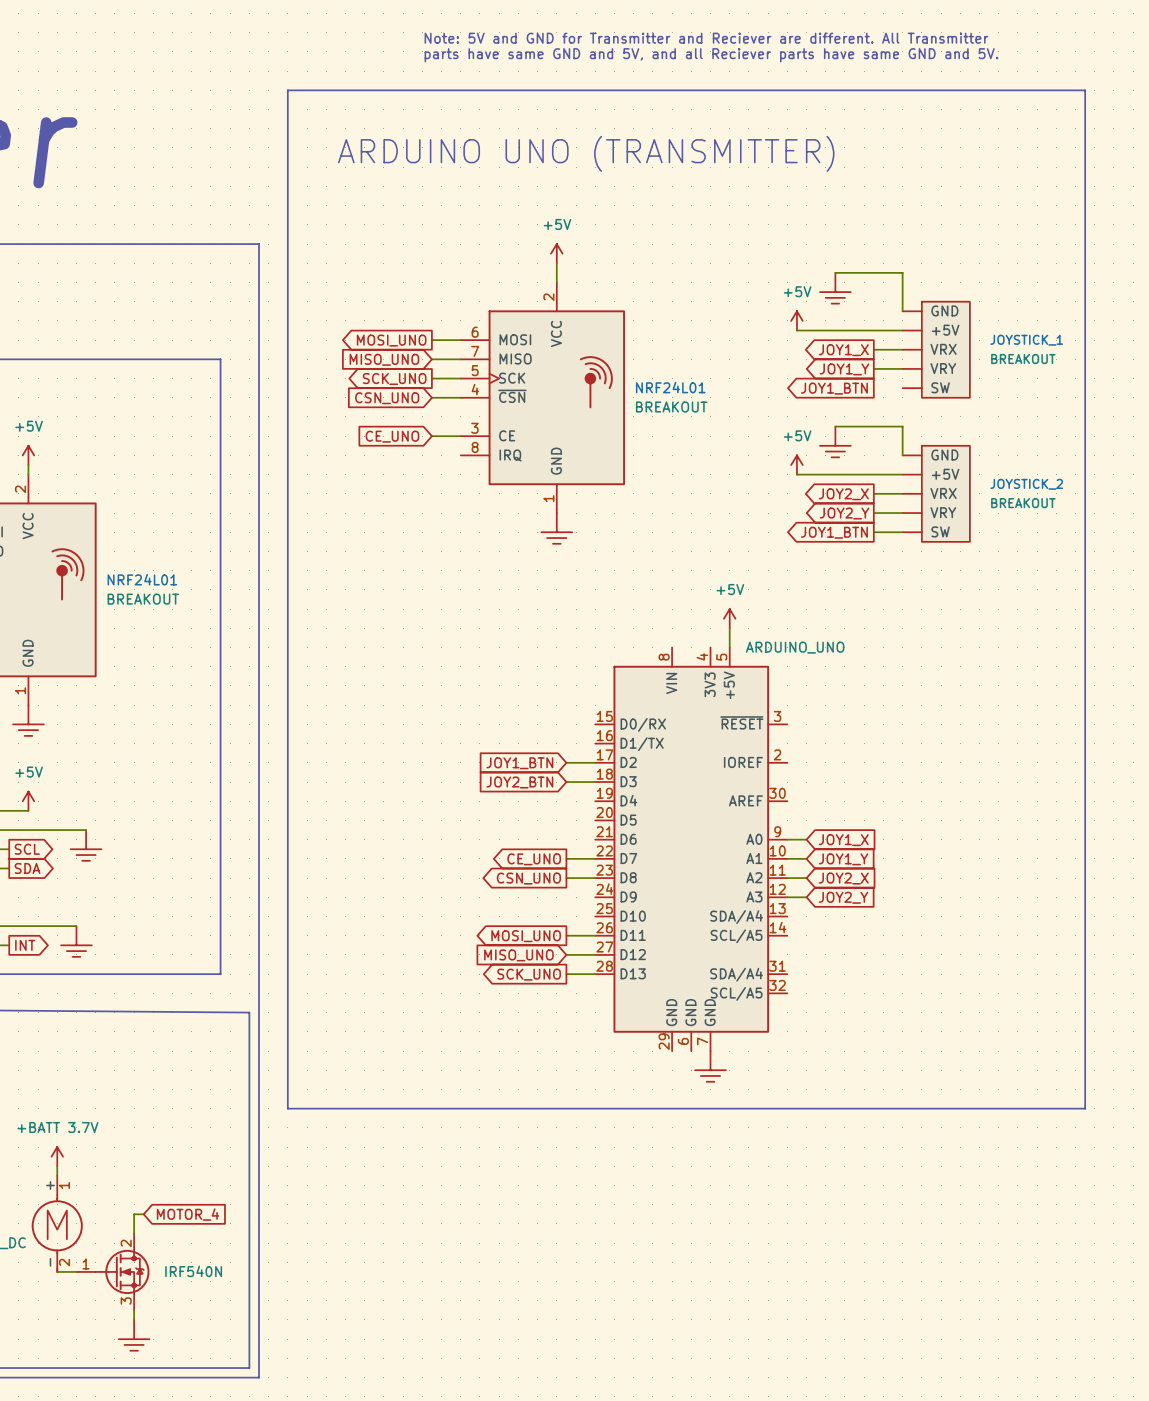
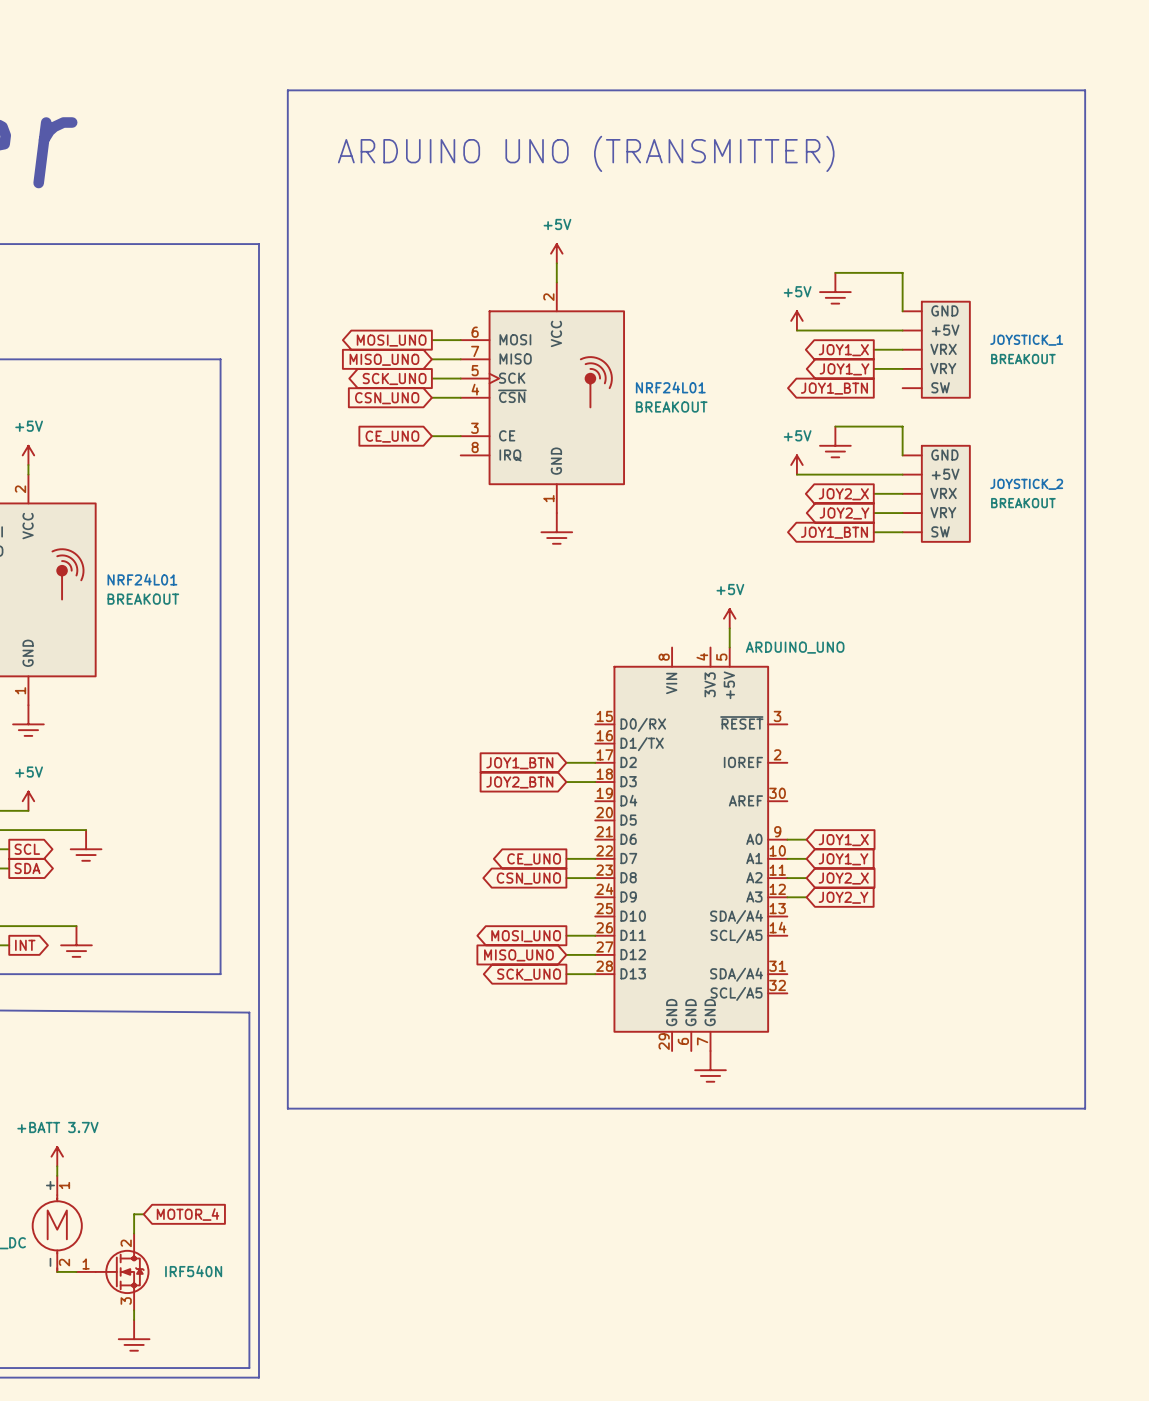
text: Note: 5V and GND for Transmitter and Reciever are different. All Transmitter (706, 38) -> none
text: parts have same GND and 5V, and all Reciever parts have same GND and 5V. (711, 55) -> none

